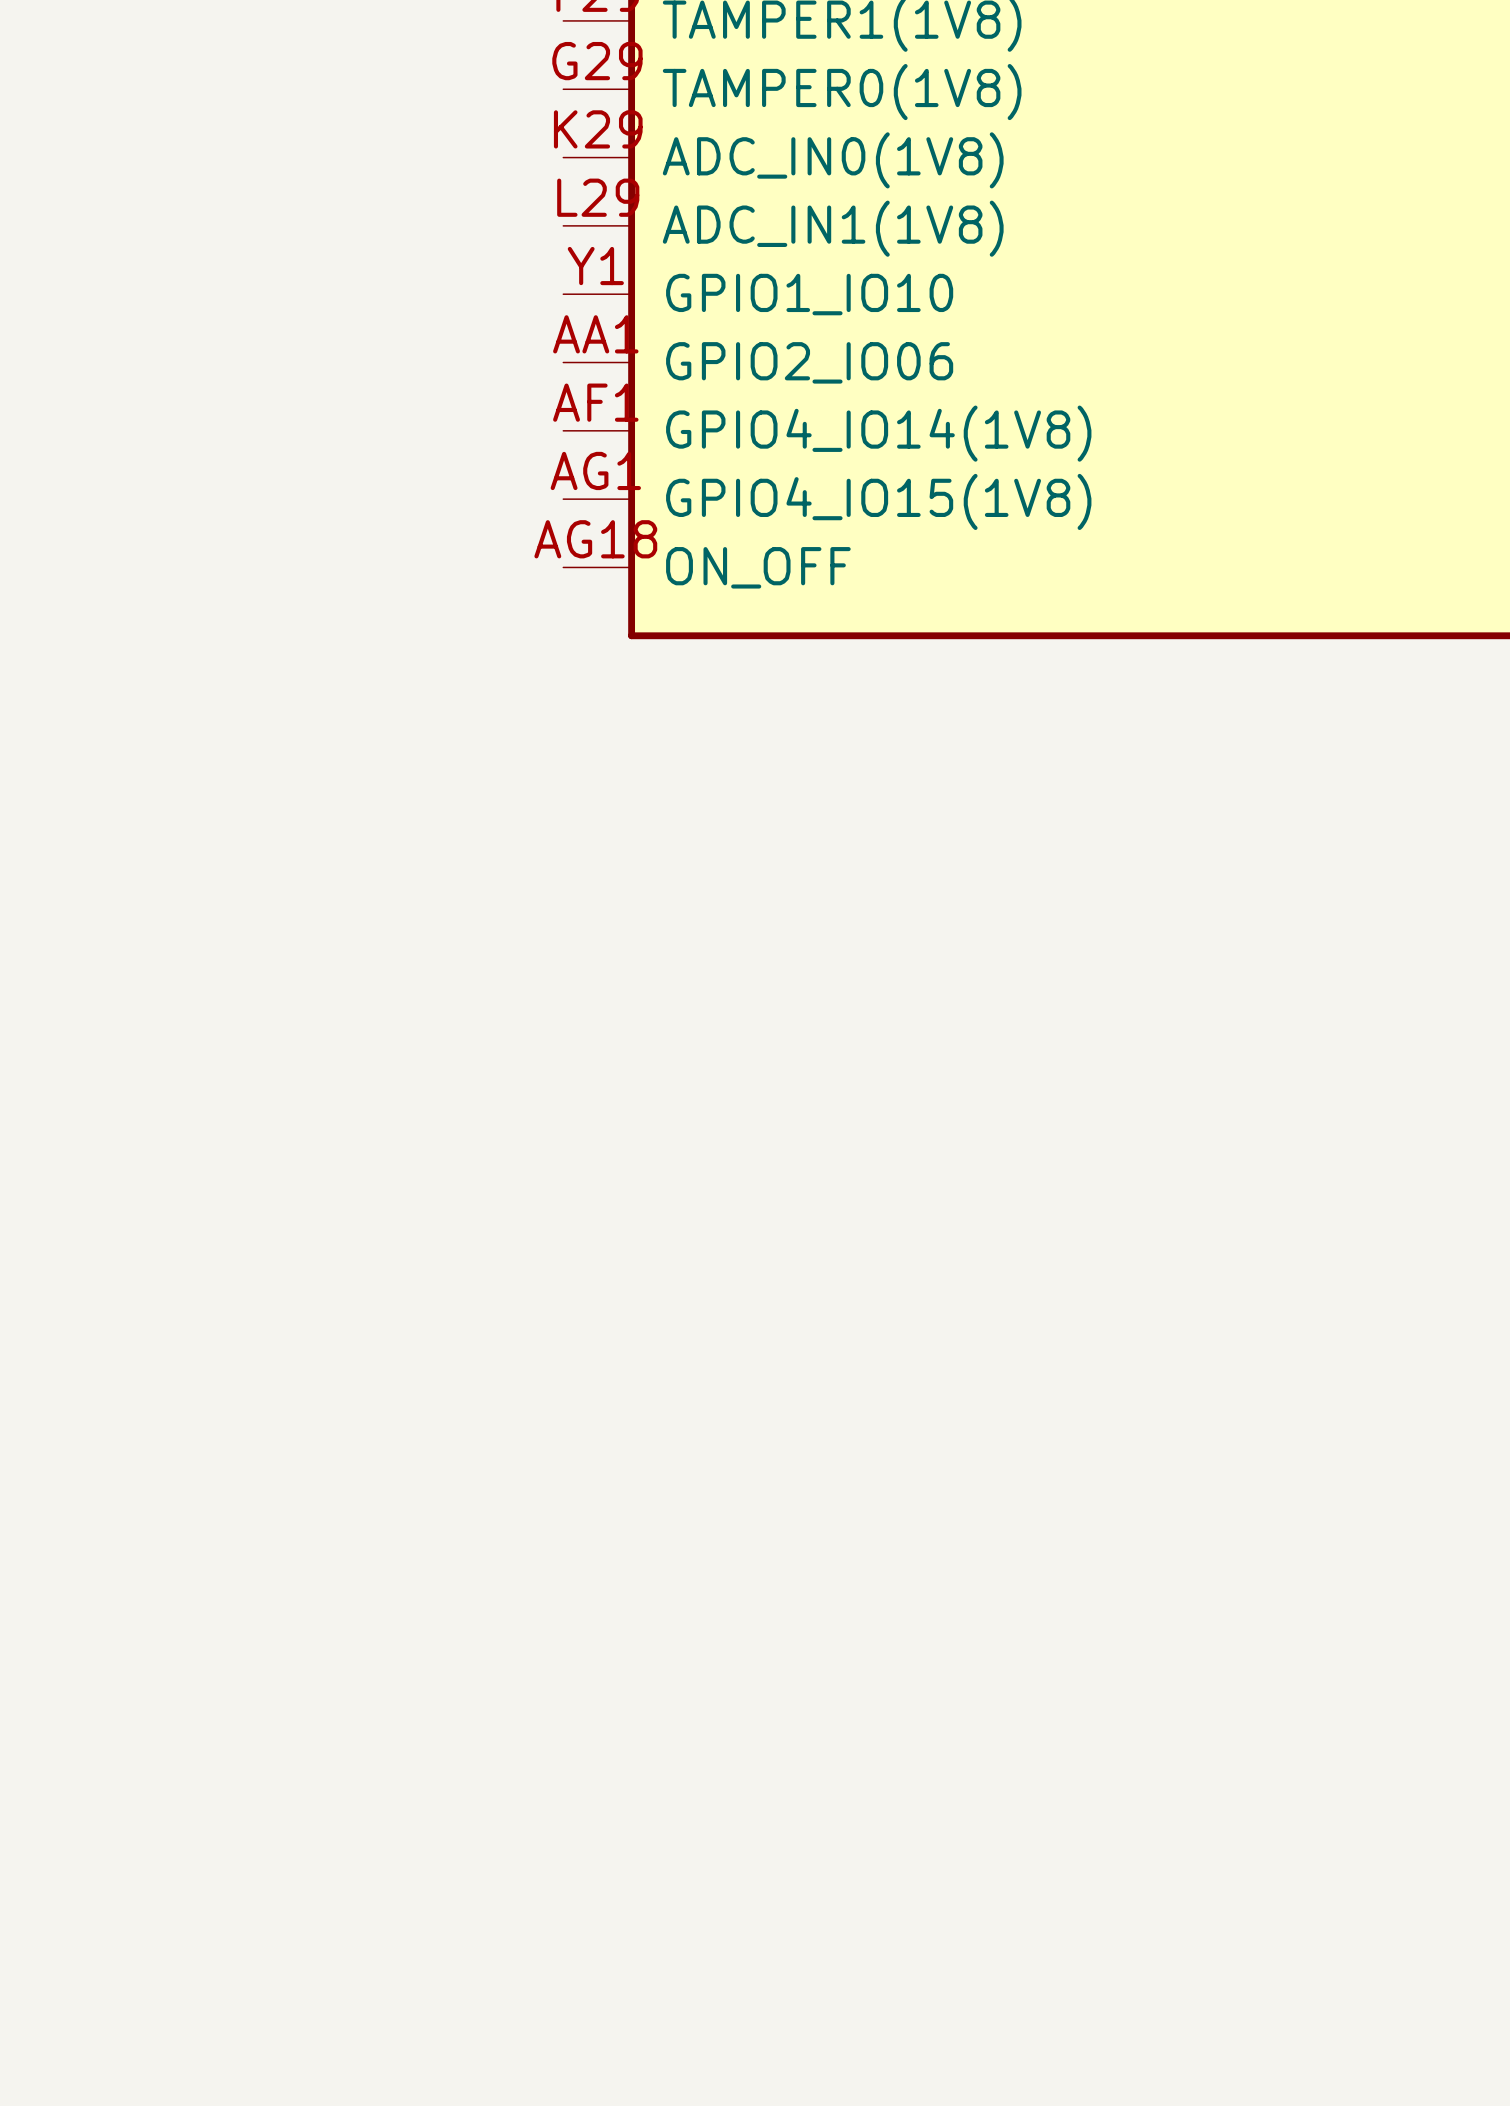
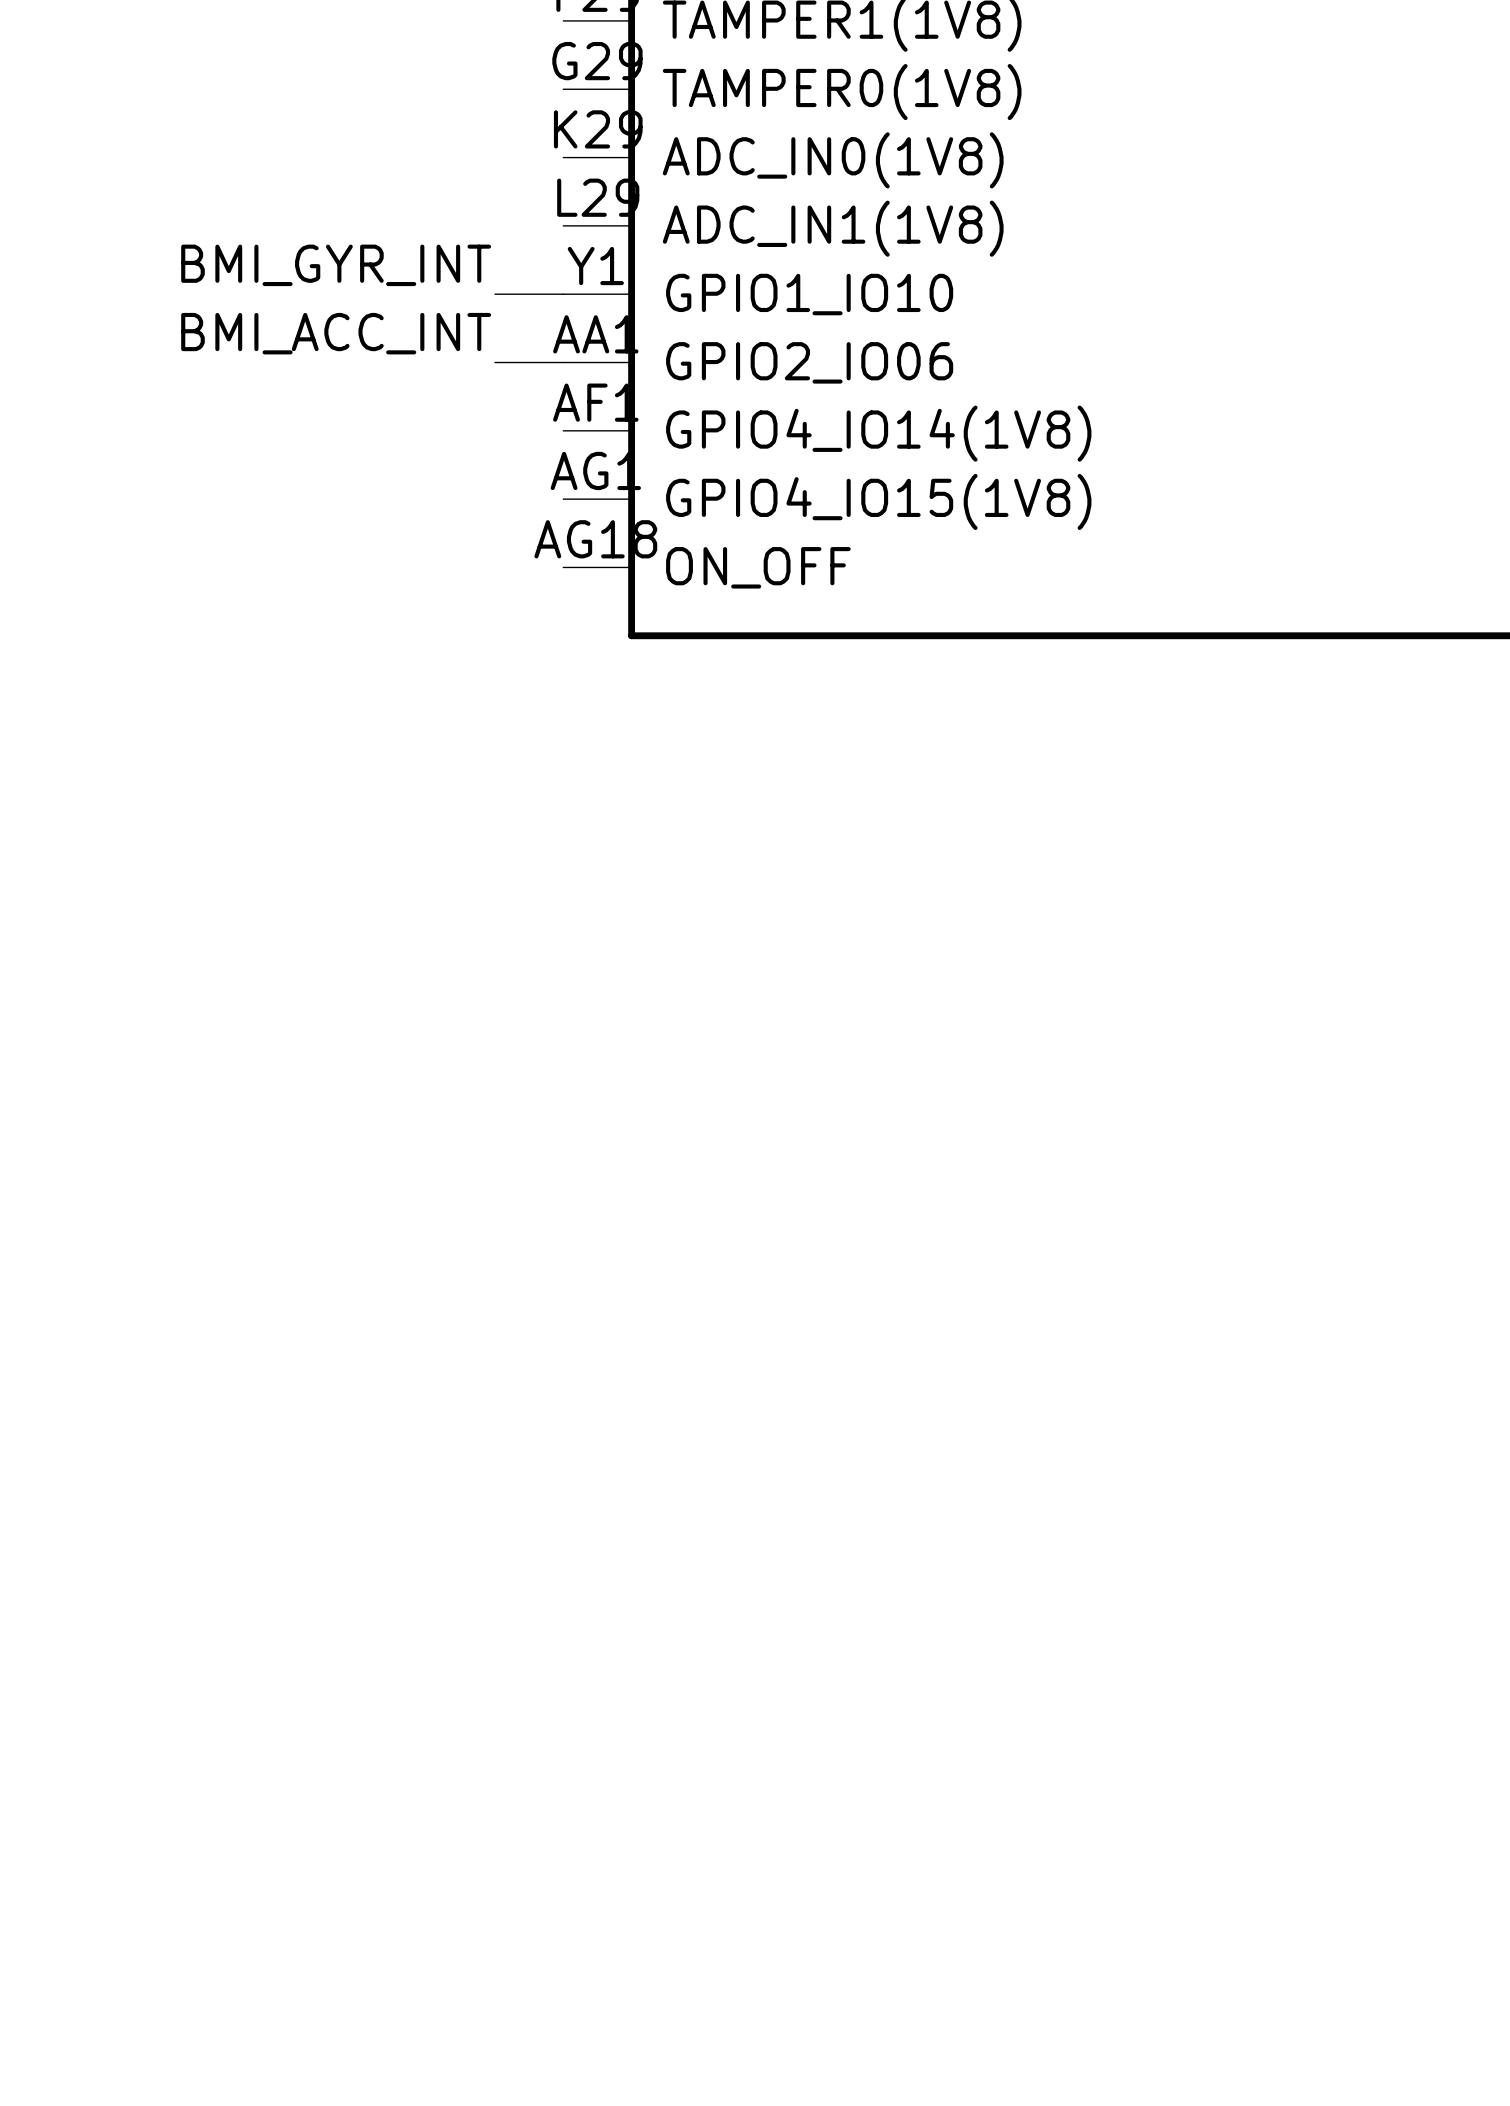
label: none -> BMI_GYR_INT (336, 265)
wire: none -> (494, 294) (563, 294)
label: none -> BMI_ACC_INT (336, 333)
wire: none -> (494, 362) (563, 362)

